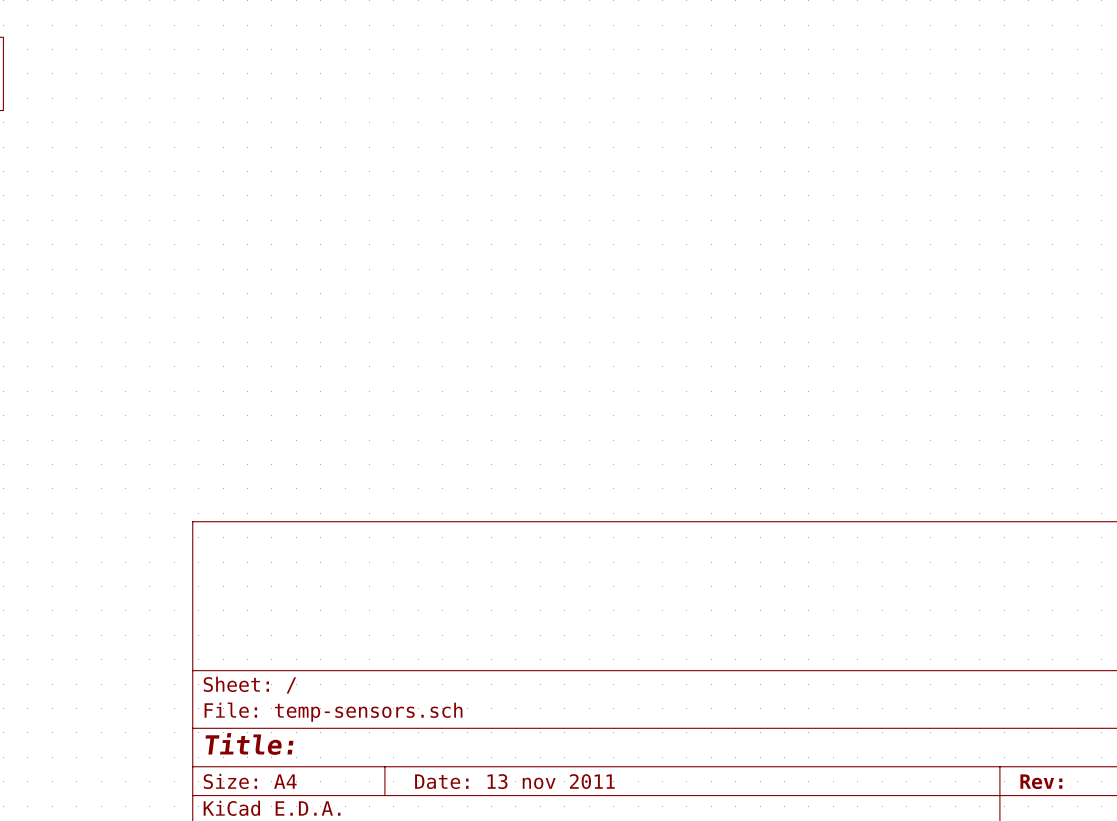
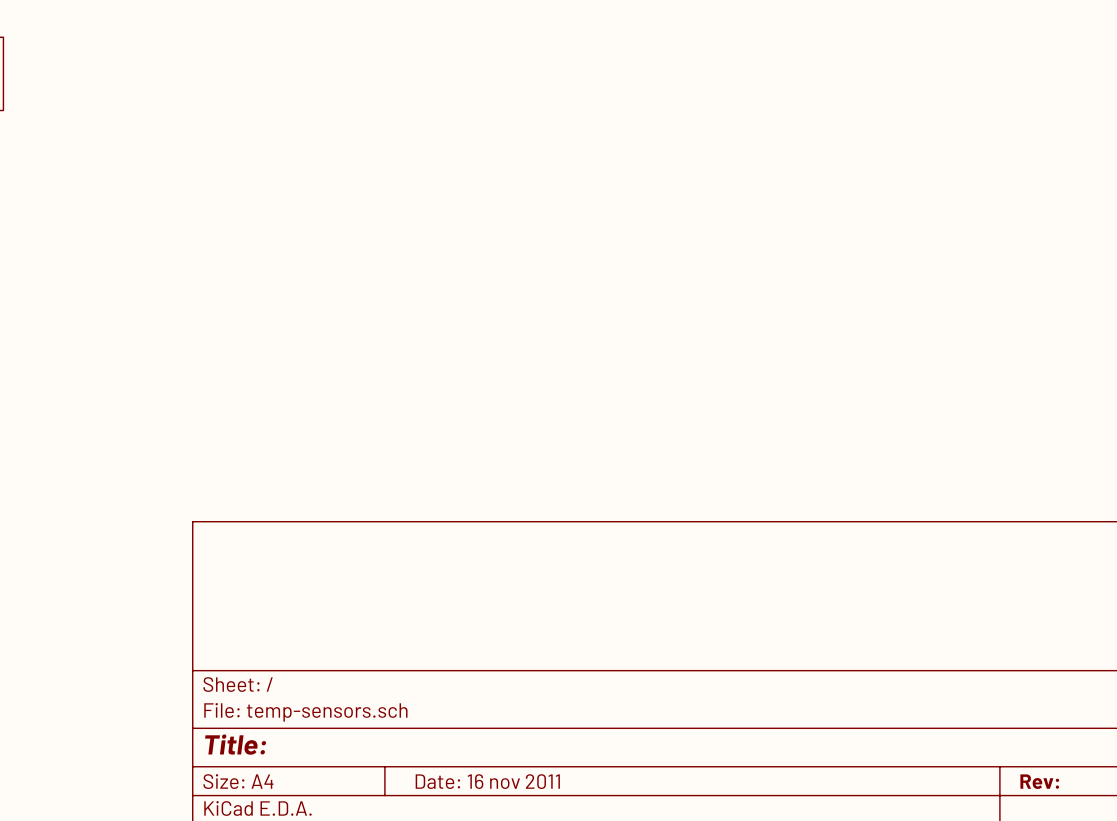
title block: Date: 13 nov 2011 (514, 781) -> Date: 16 nov 2011 (487, 781)

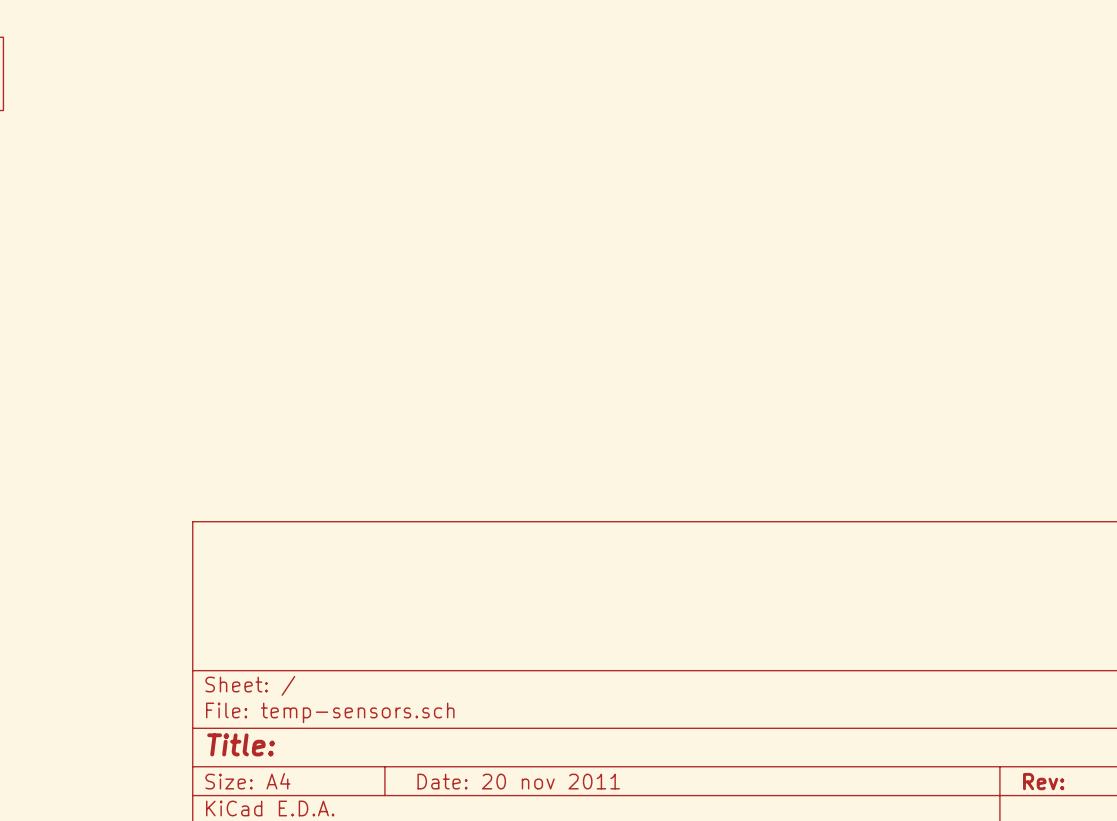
title block: Date: 16 nov 2011 (487, 781) -> Date: 20 nov 2011 (518, 781)

